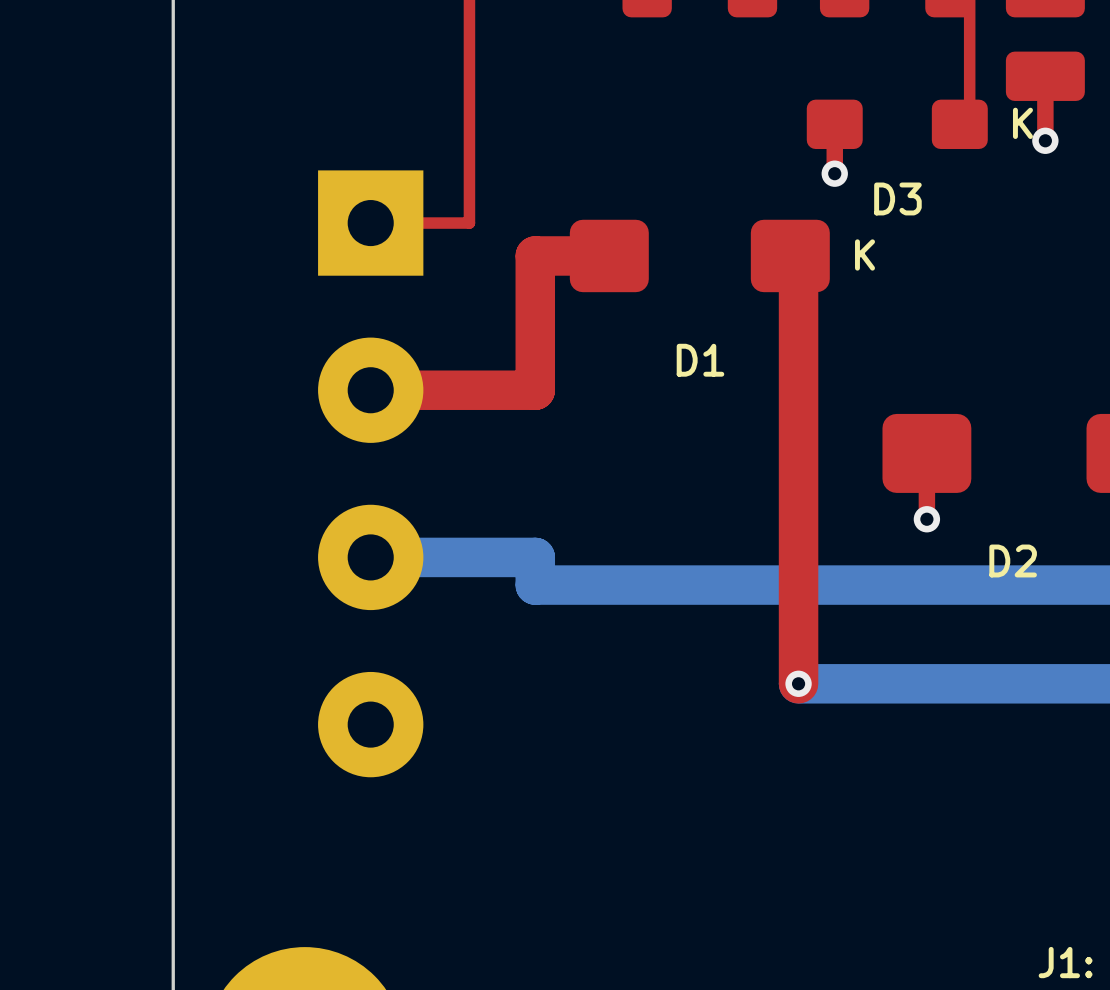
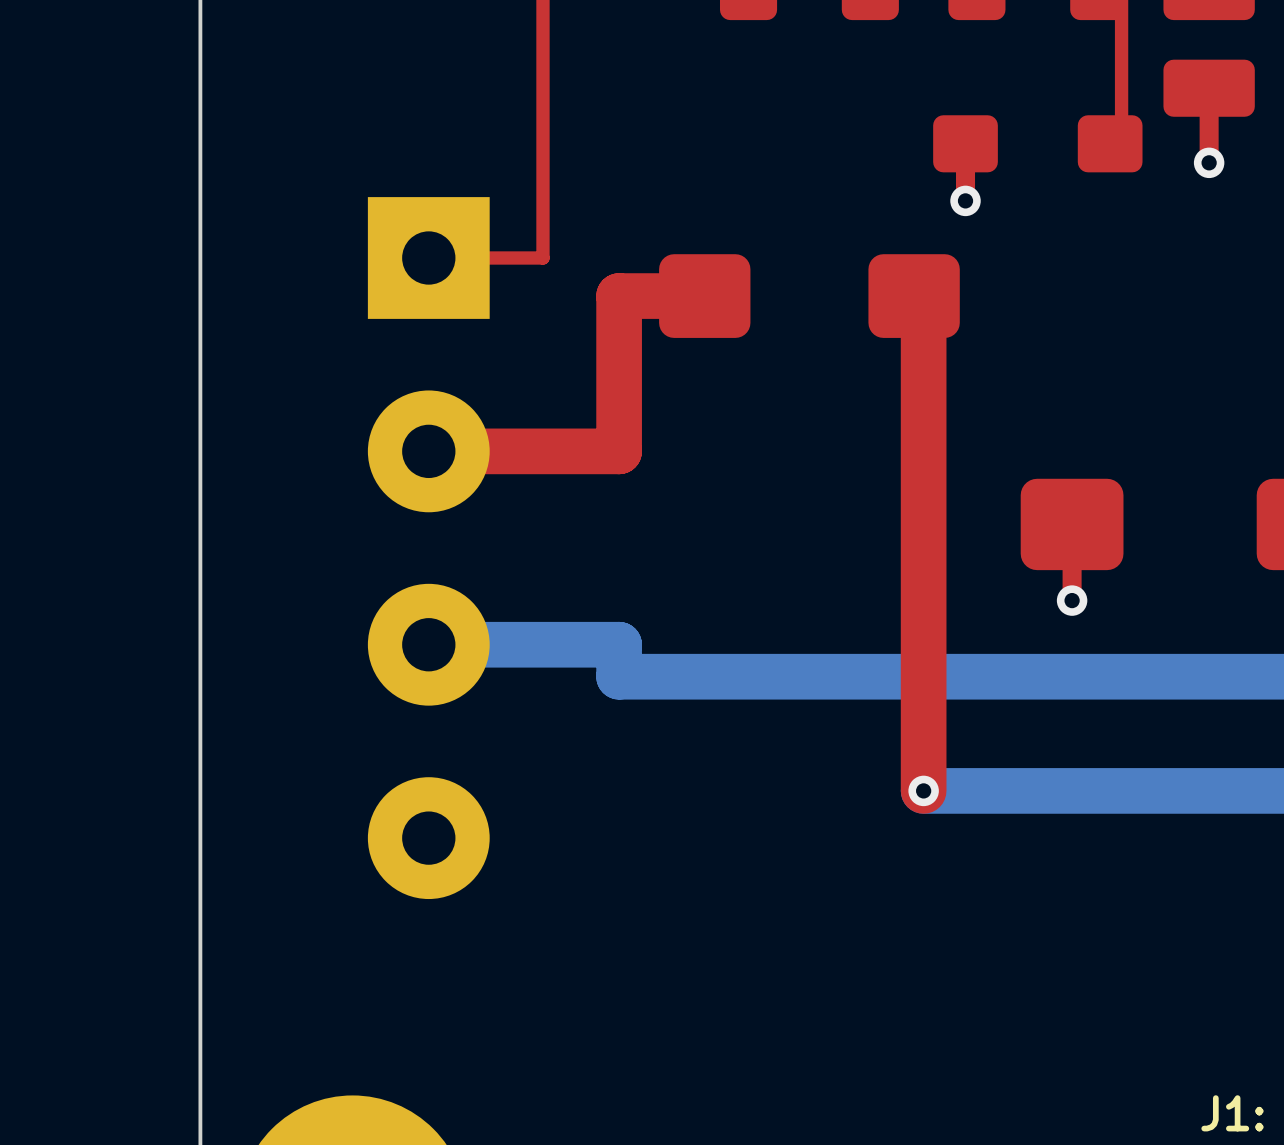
text: K (1022, 123) -> none
text: D3 (897, 198) -> none
text: K (865, 254) -> none
text: D1 (700, 360) -> none
text: D2 (1013, 560) -> none

